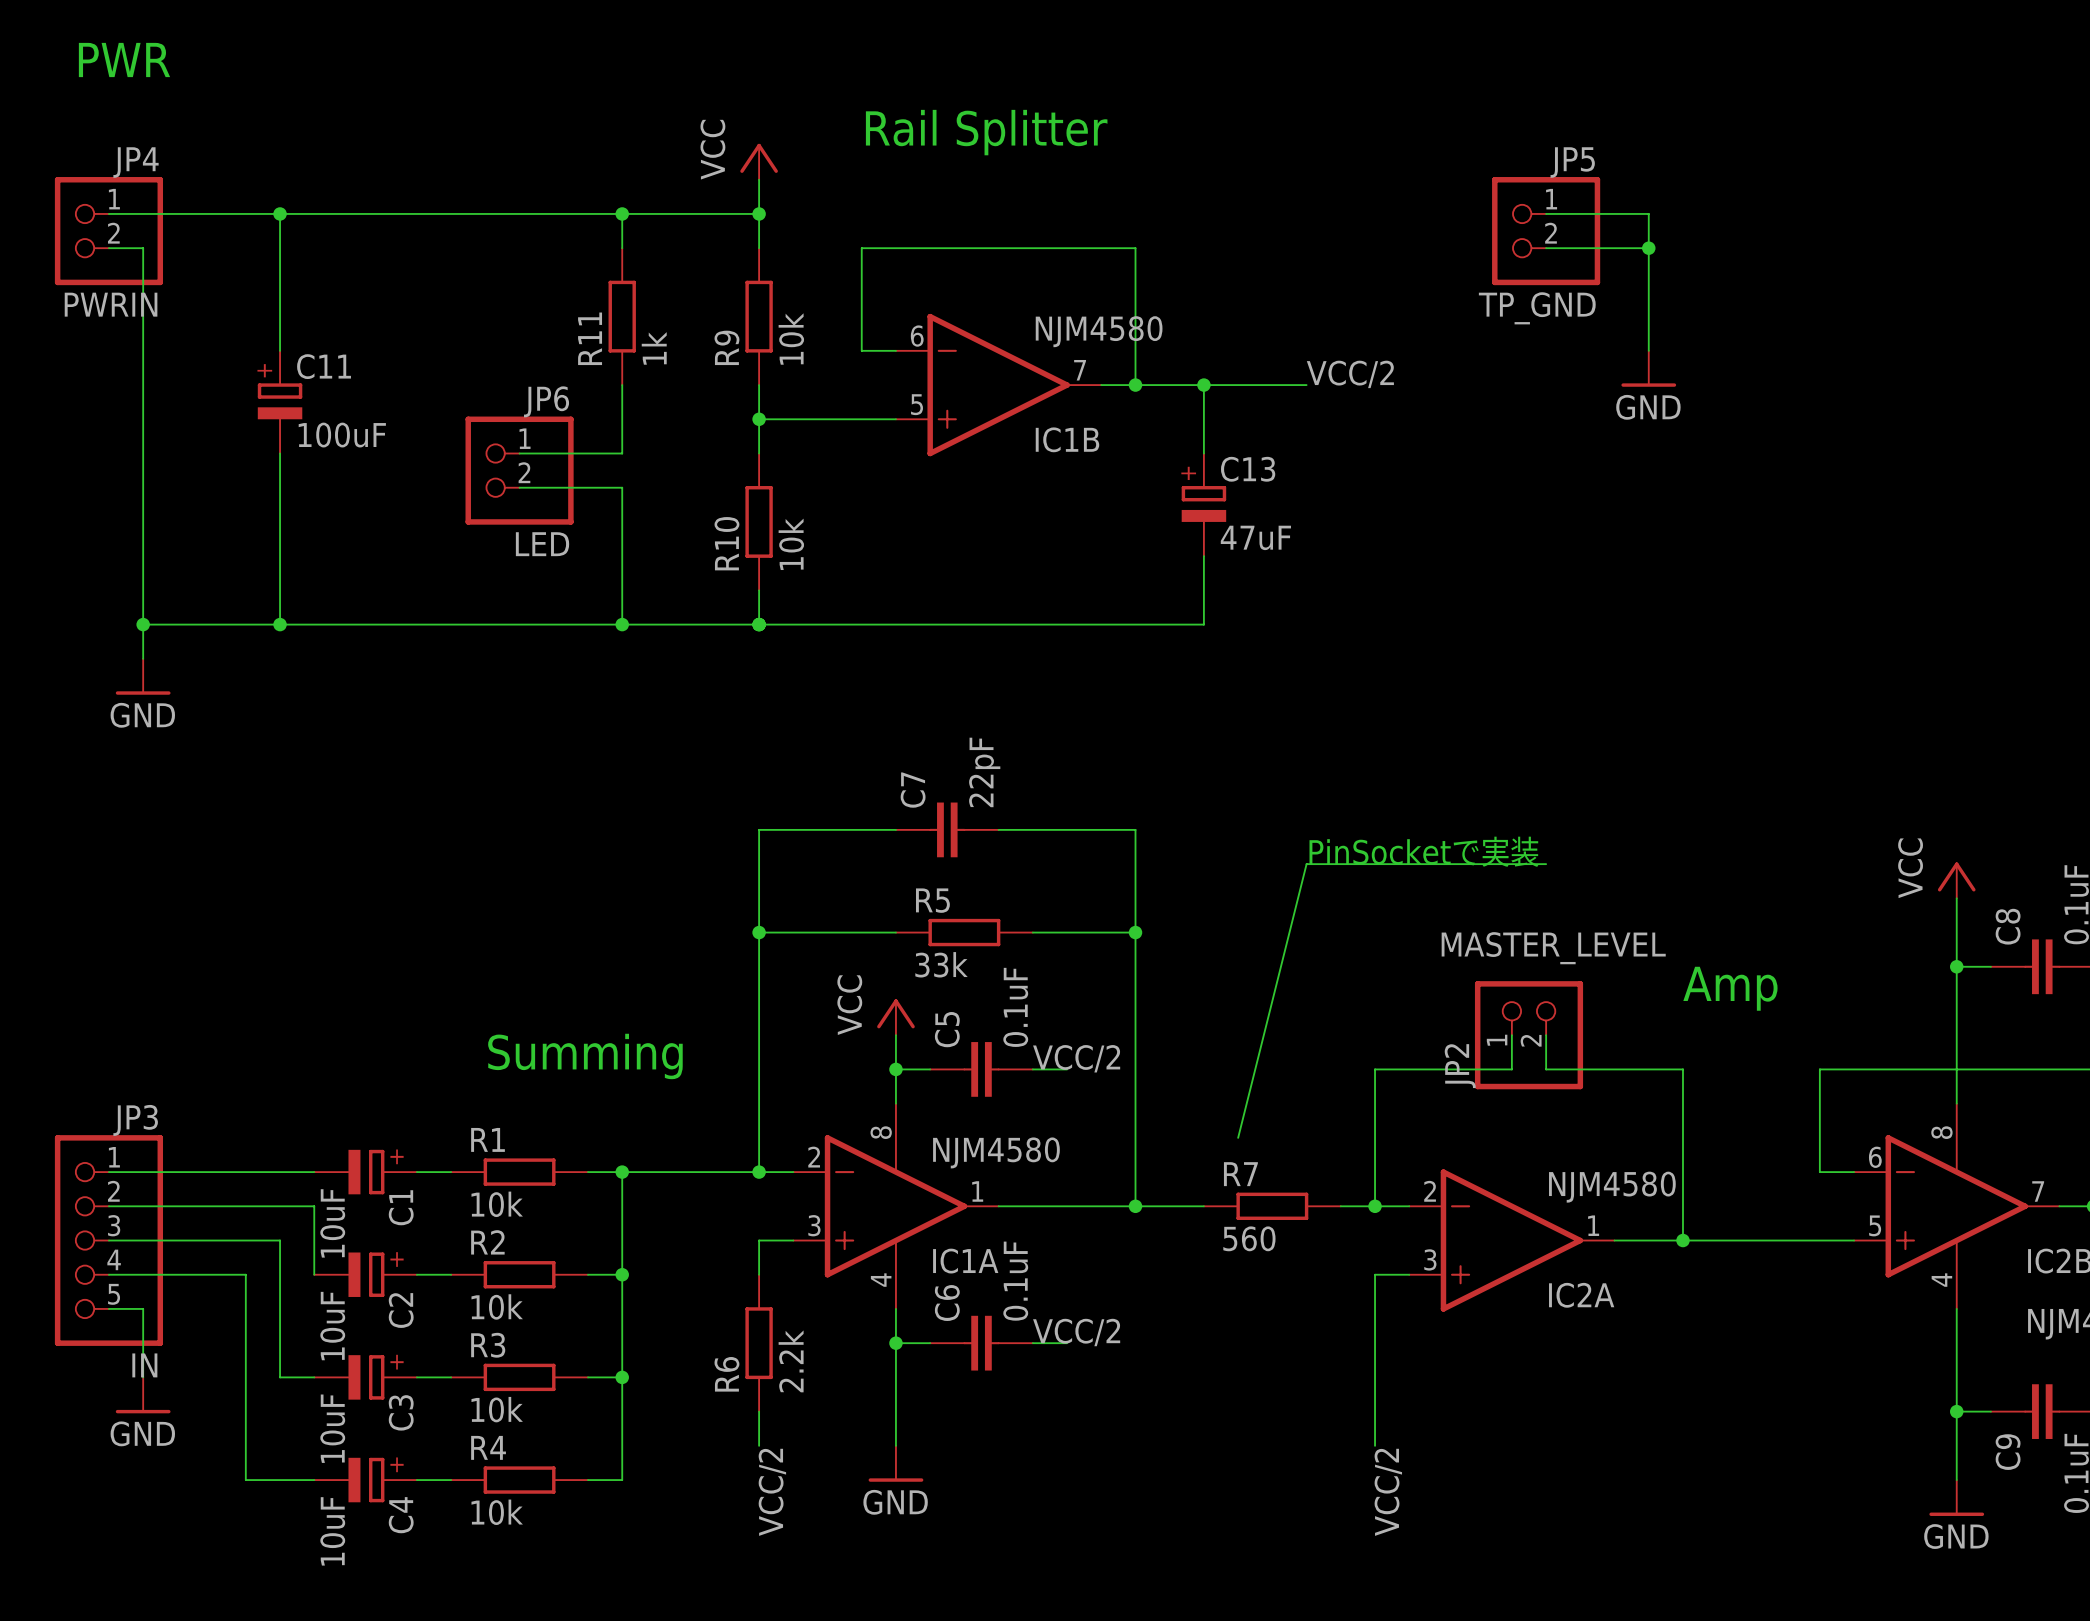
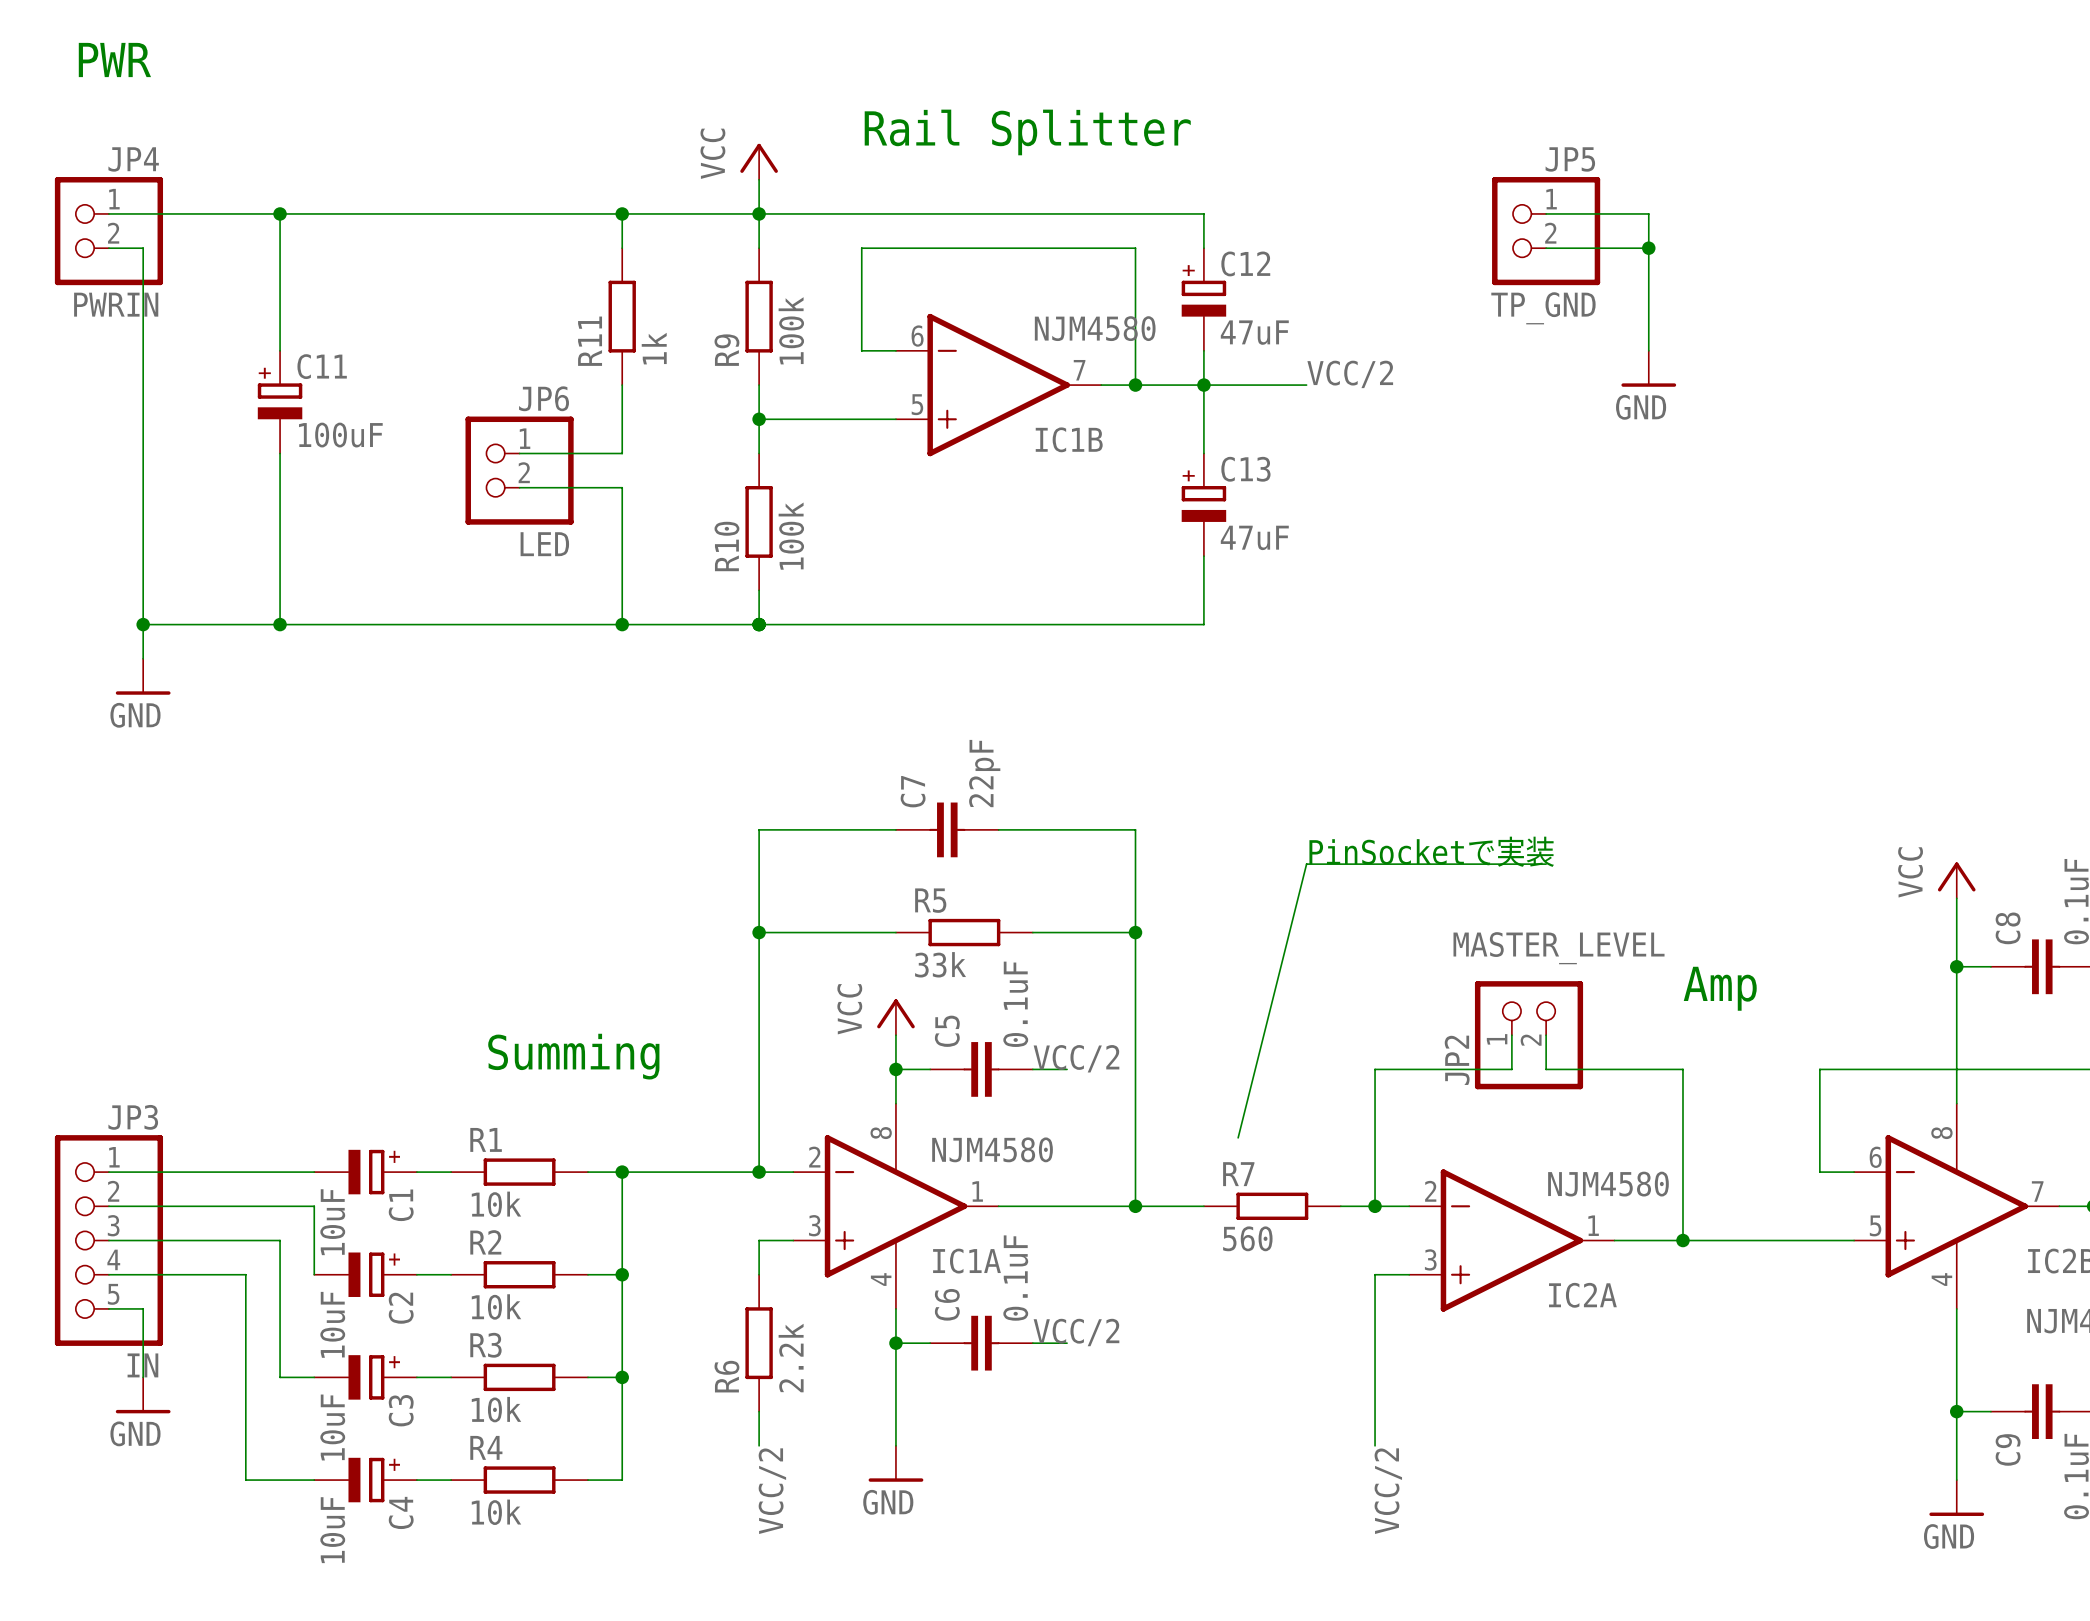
wire: none -> (759, 213) (1203, 213) (1203, 248)
C12: none -> 47uF (1203, 299)
R9 value: 10k (791, 339) -> 100k (791, 330)
wire: none -> (1203, 350) (1203, 385)
R10 value: 10k (791, 544) -> 100k (791, 536)

